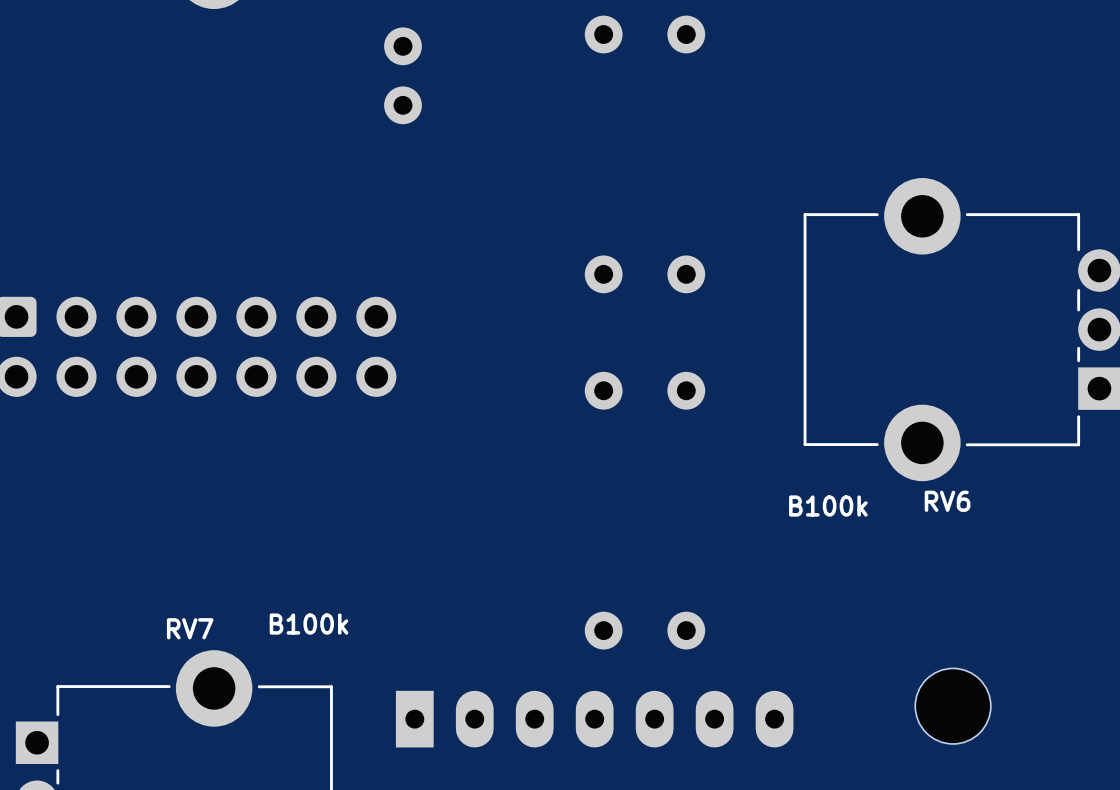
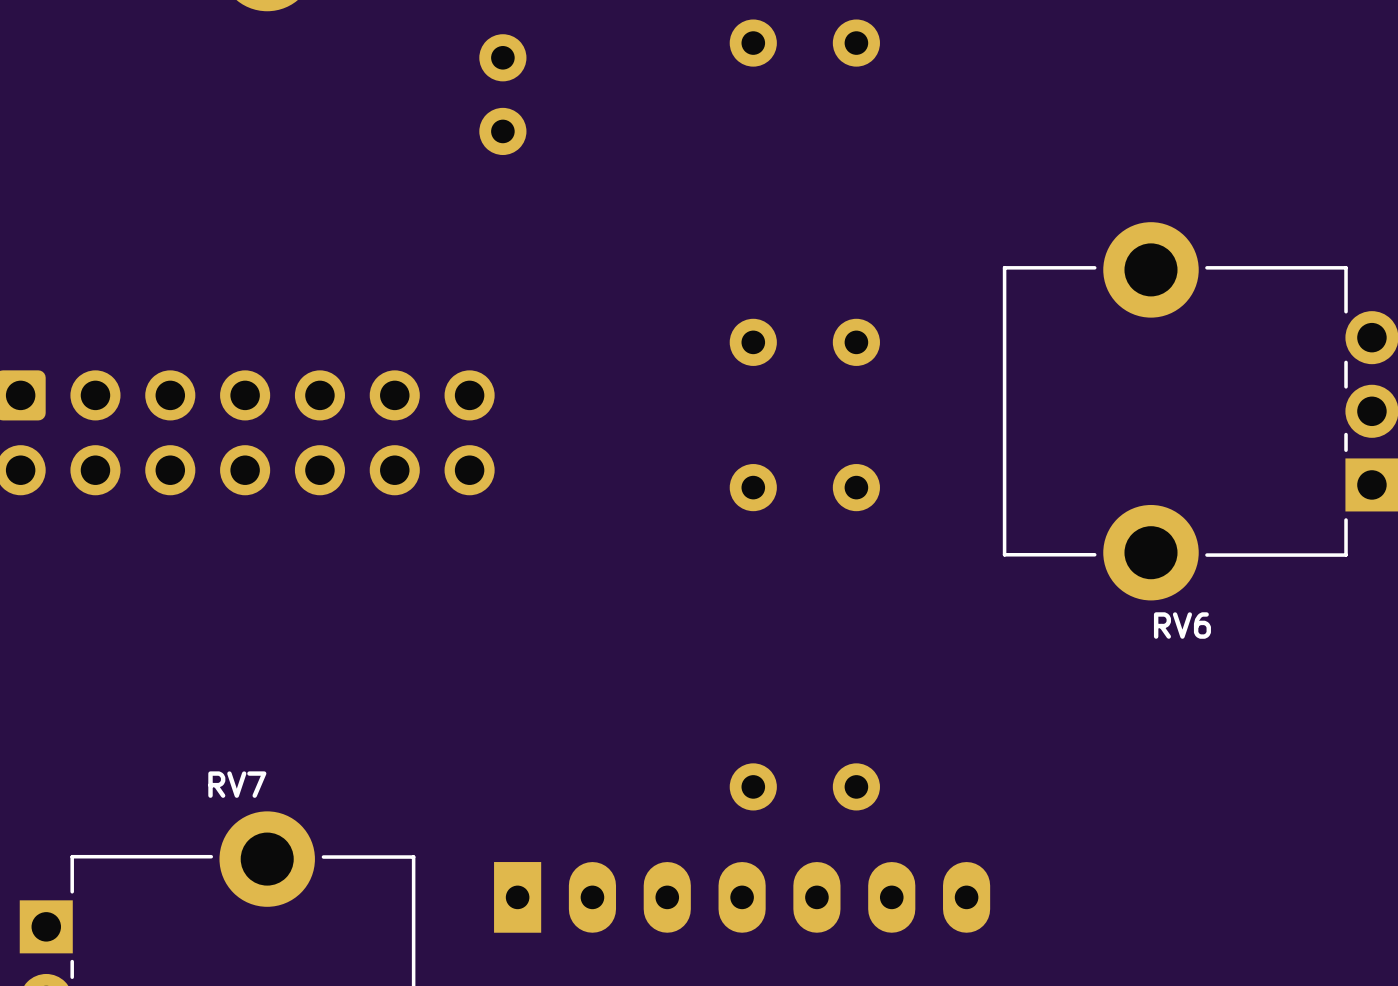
RV6 value: B100k (828, 506) -> none
RV7 value: B100k (308, 624) -> none
part: (953, 706) -> none

